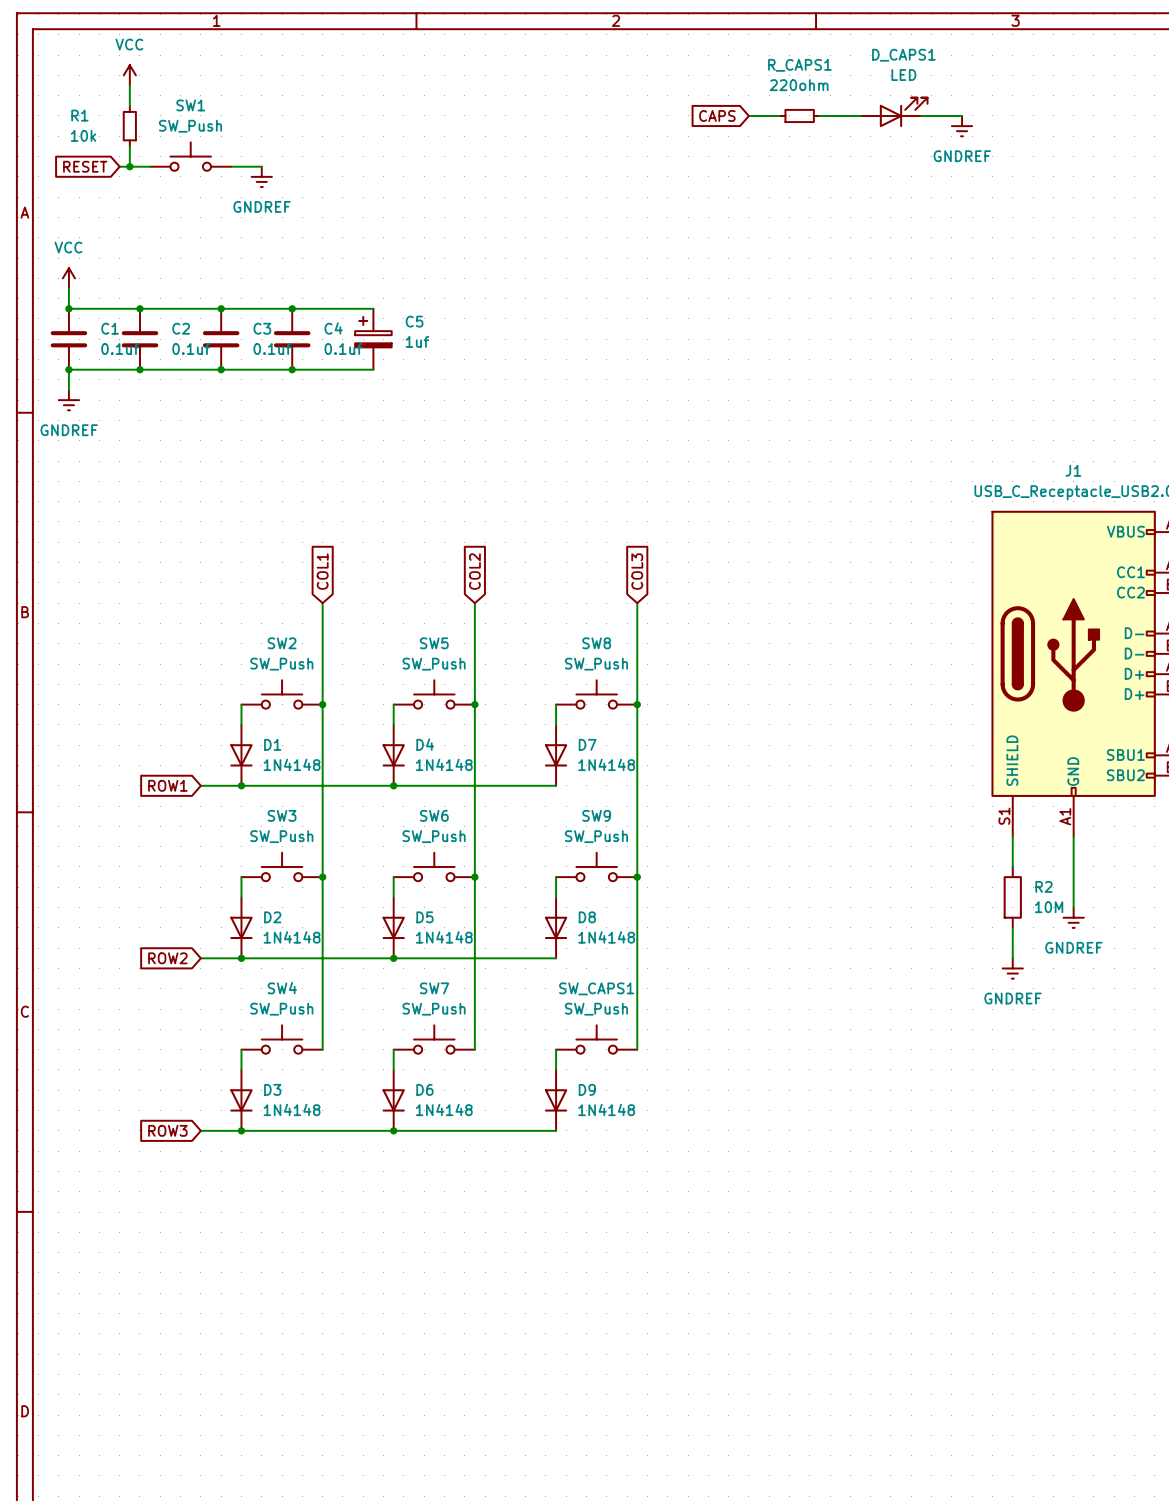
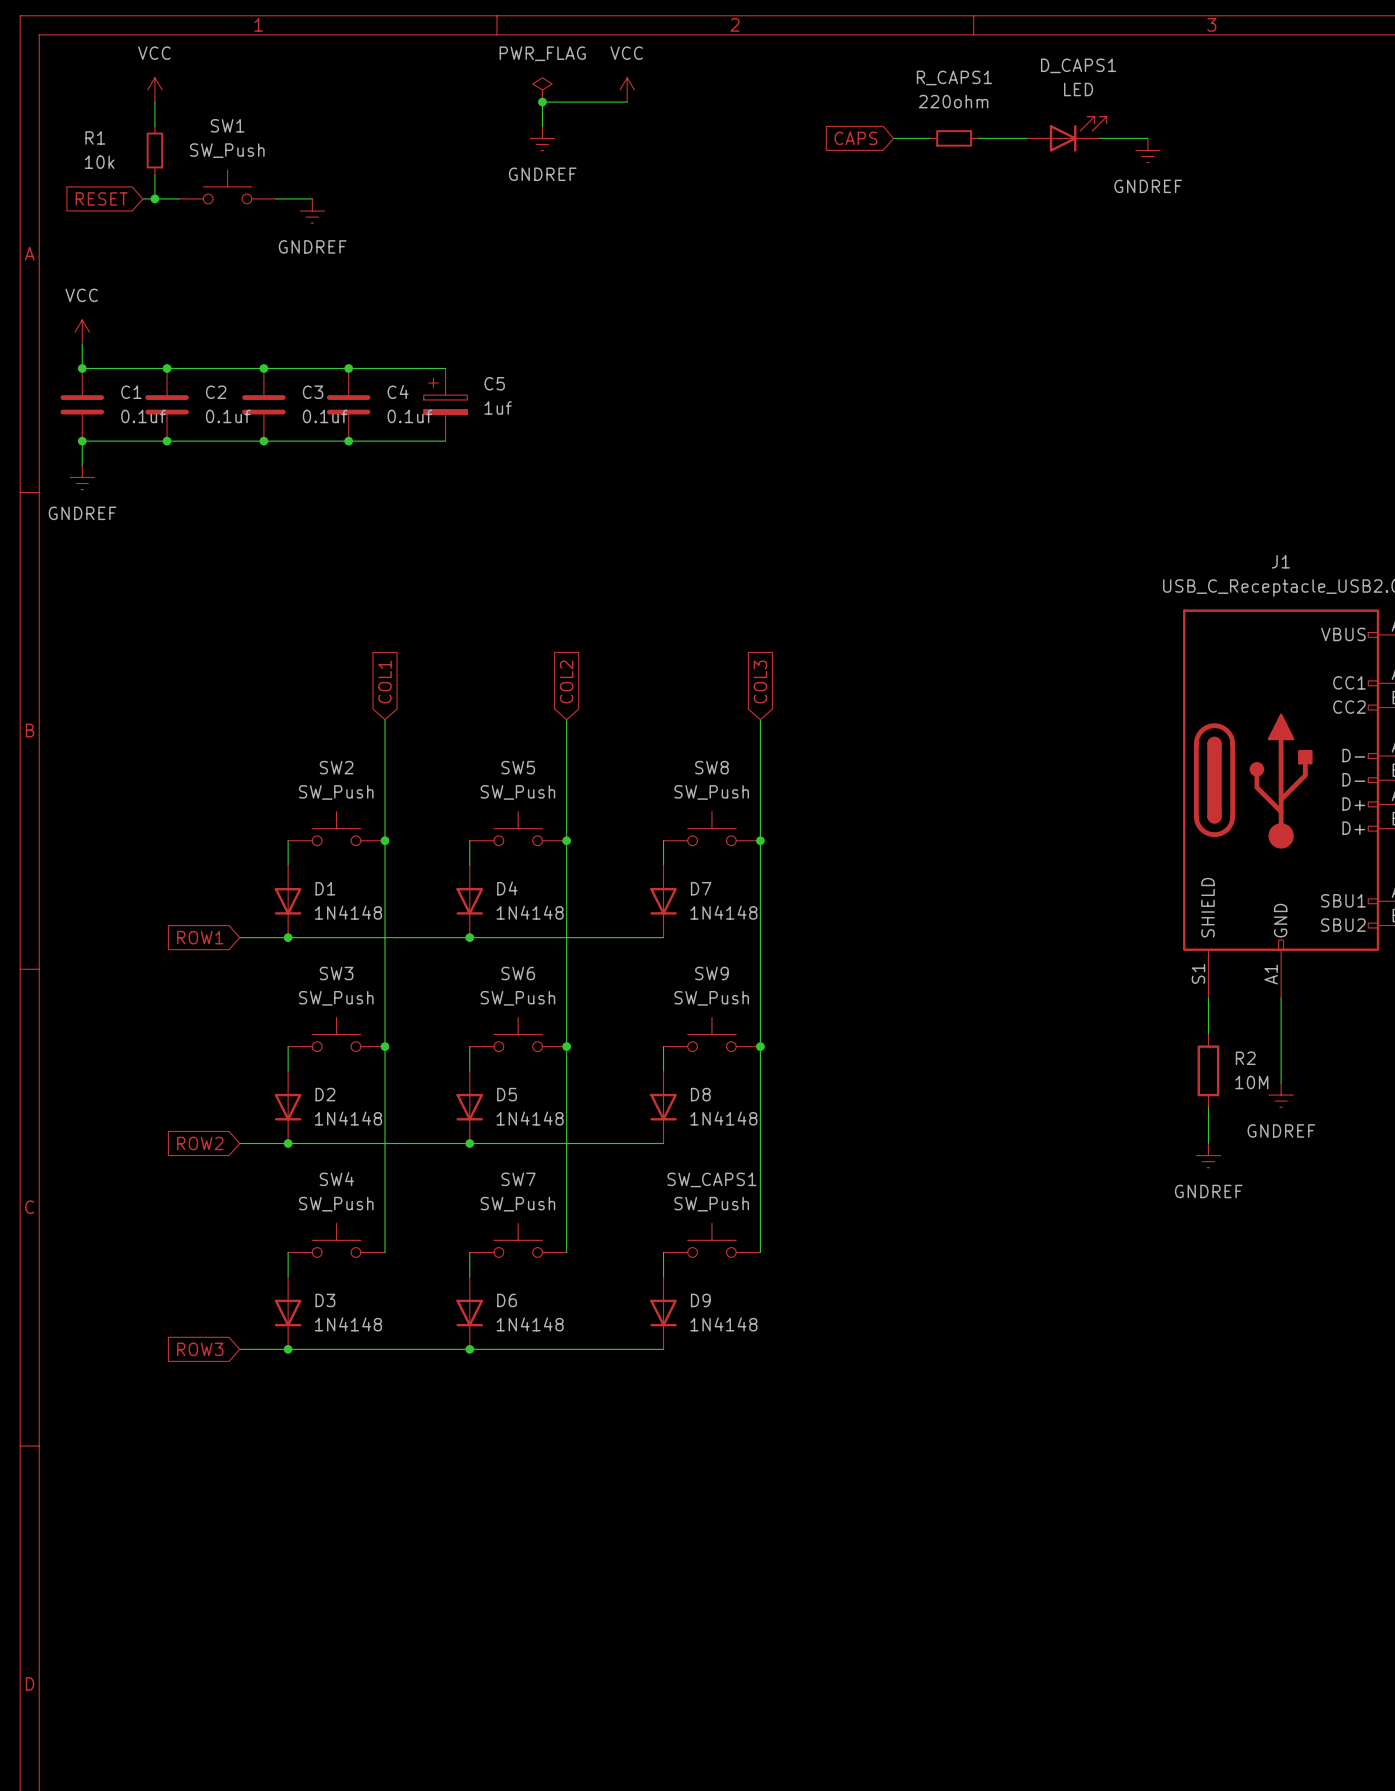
power symbol: none -> PWR_FLAG (542, 89)
power symbol: none -> VCC (627, 89)
junction: none -> (542, 102)
wire: none -> (627, 102) (542, 102) (542, 126)
power symbol: none -> GNDREF (542, 138)

